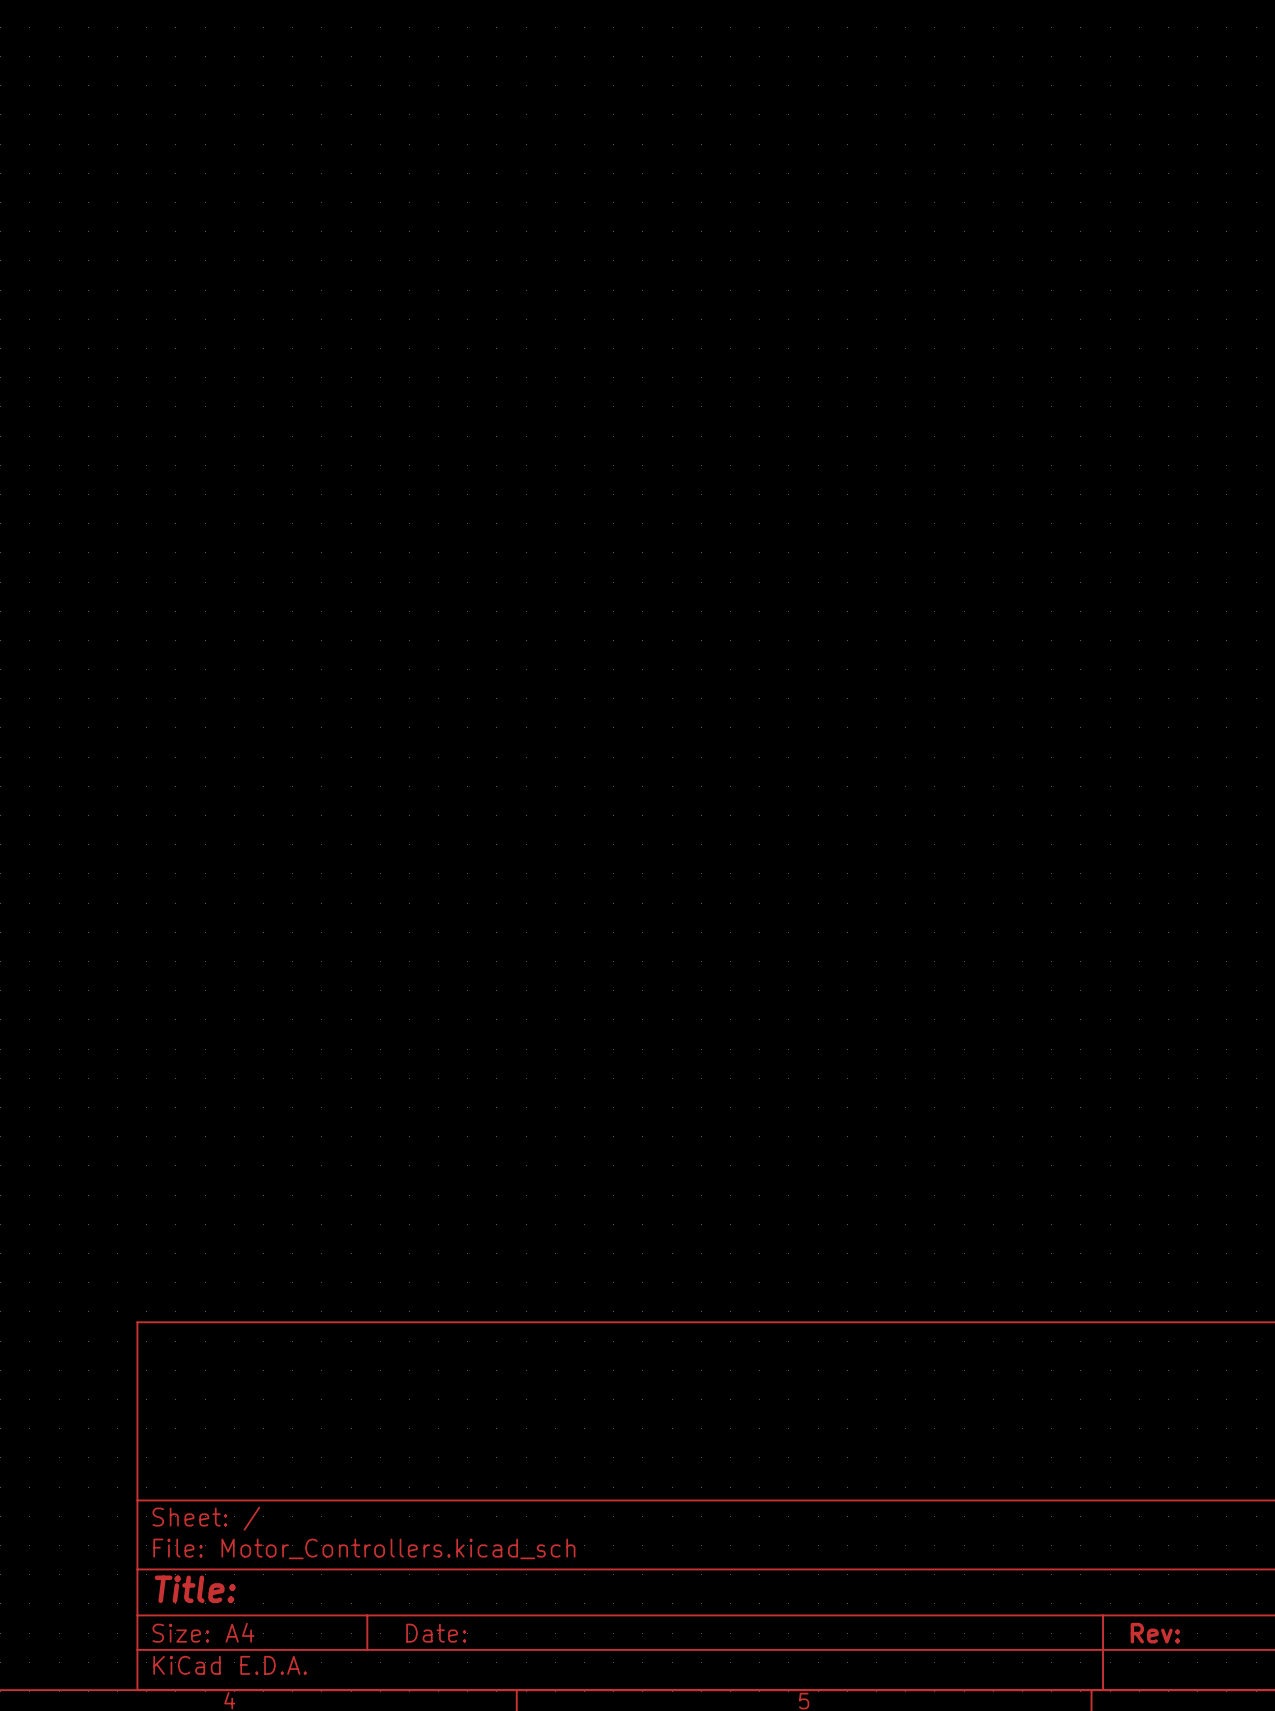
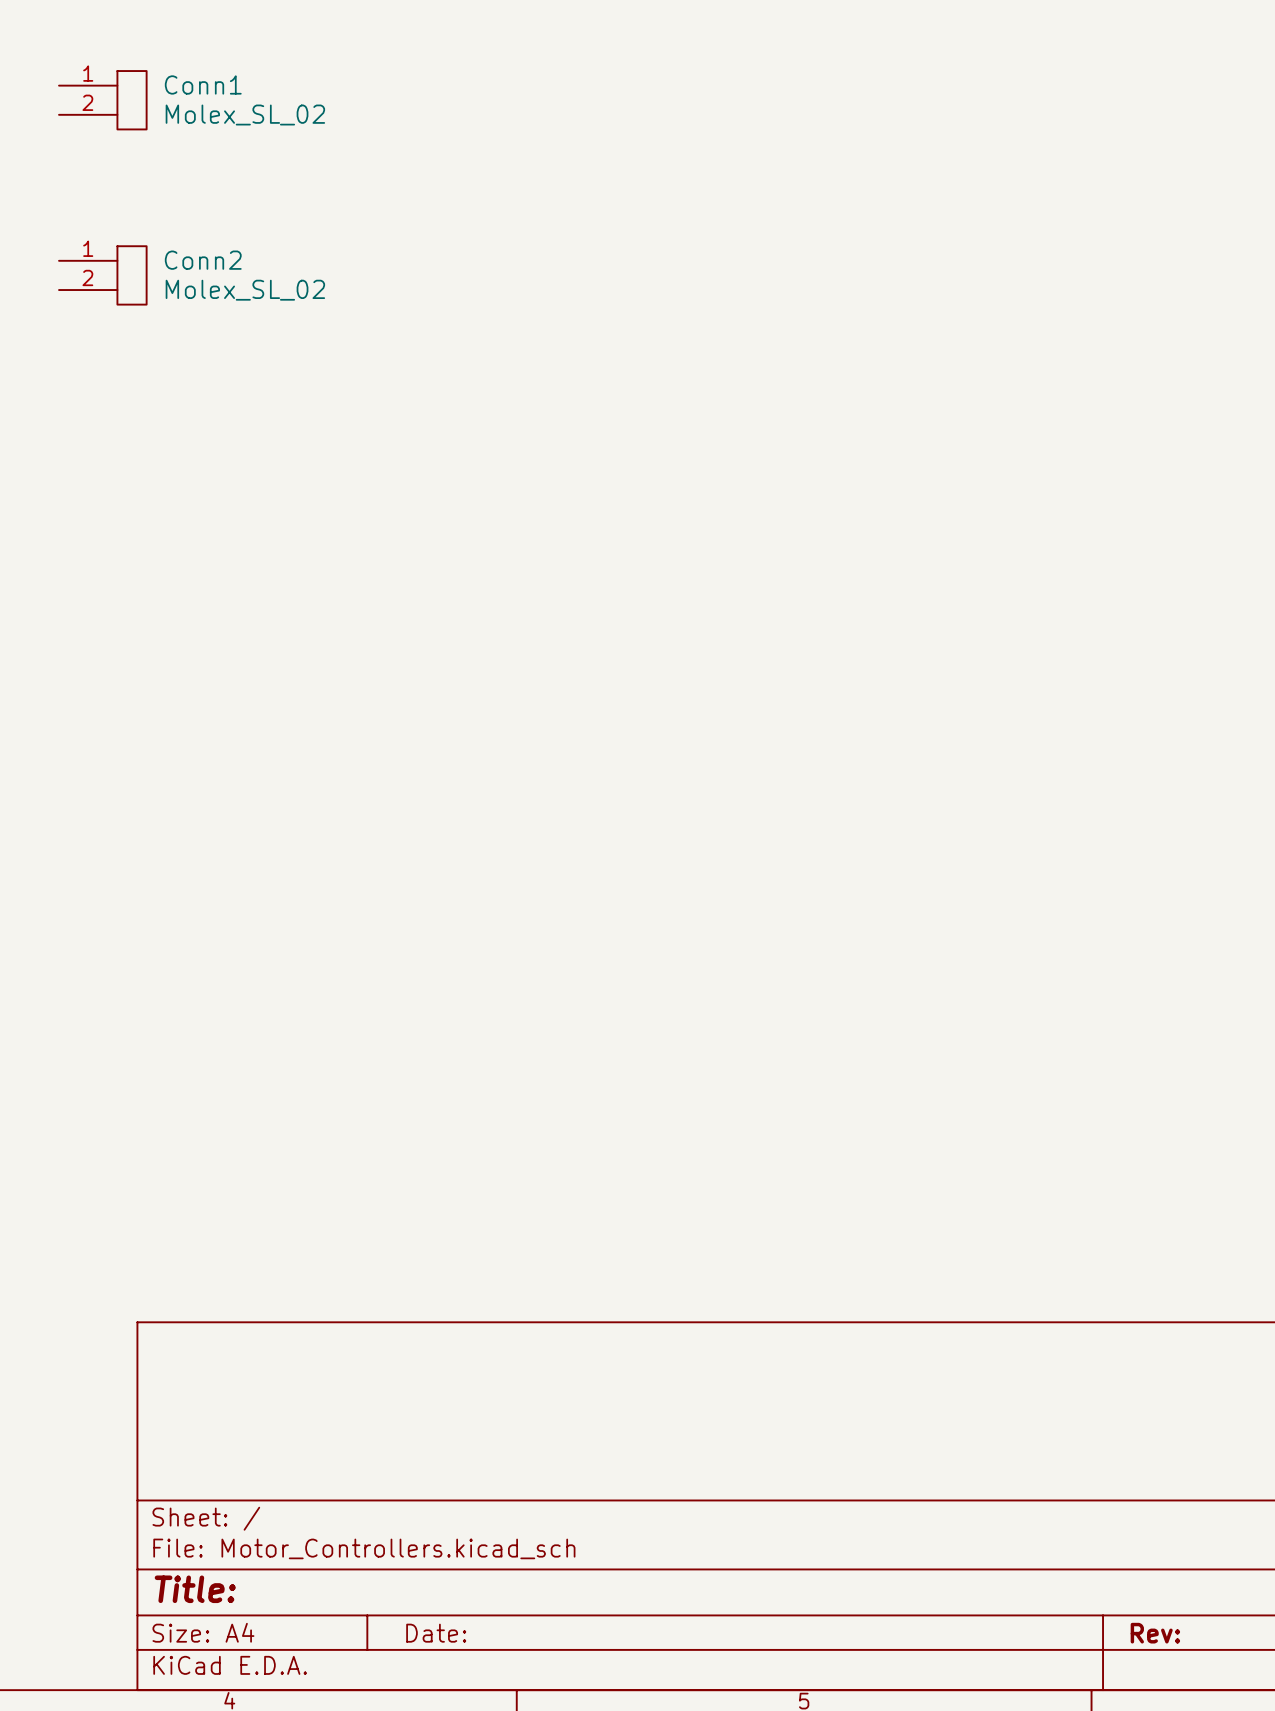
Conn1: none -> Molex_SL_02 (102, 100)
Conn2: none -> Molex_SL_02 (102, 275)

